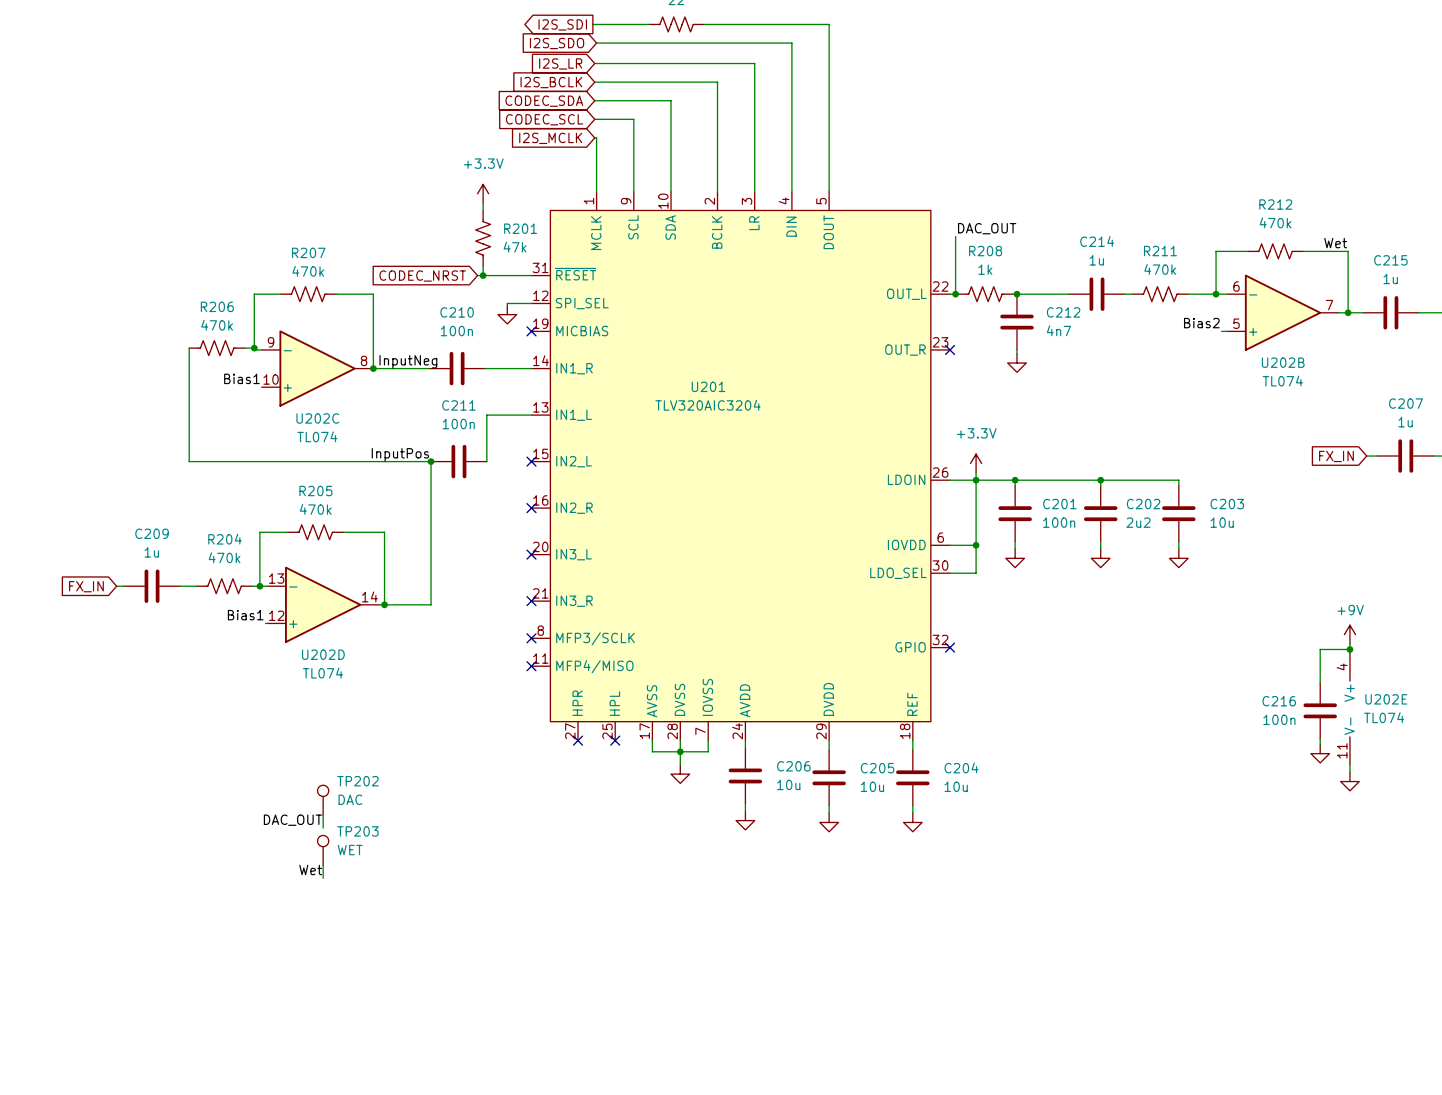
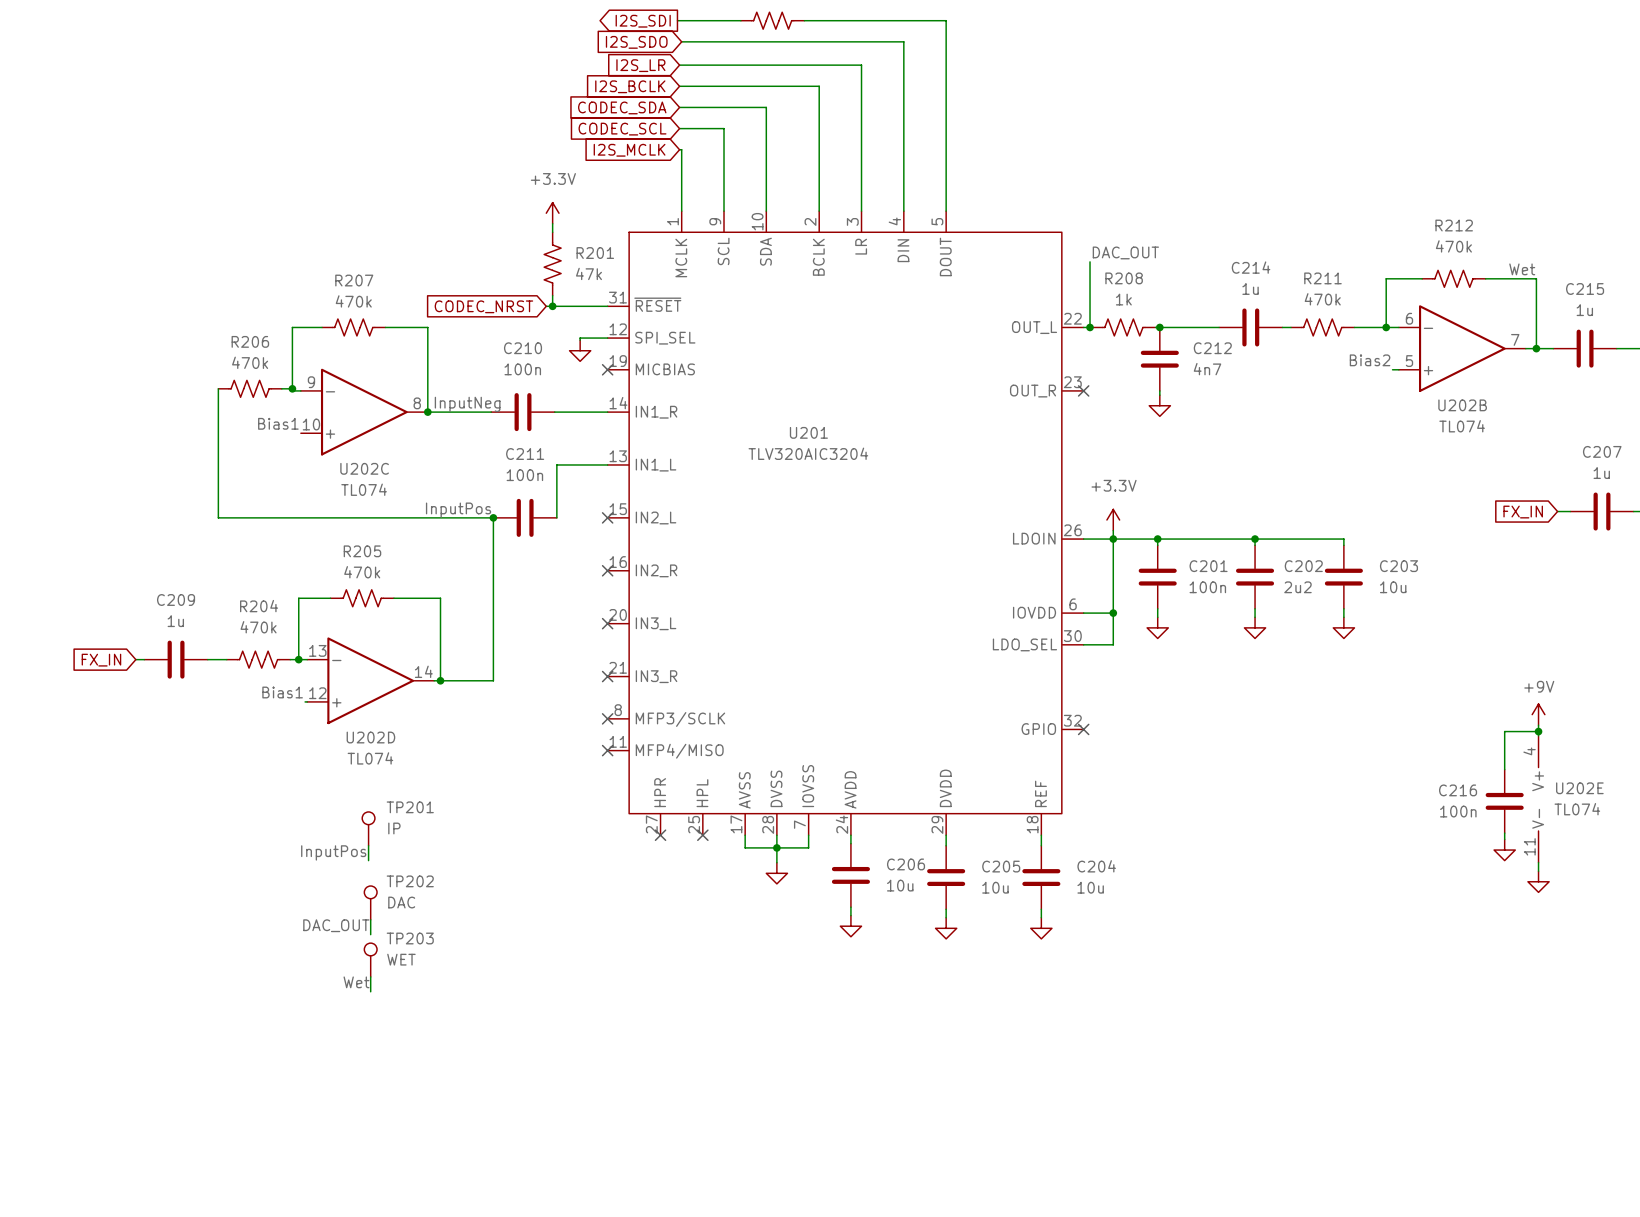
TP201: none -> IP (368, 828)
wire: none -> (368, 845) (368, 860)
label: none -> InputPos (333, 852)

